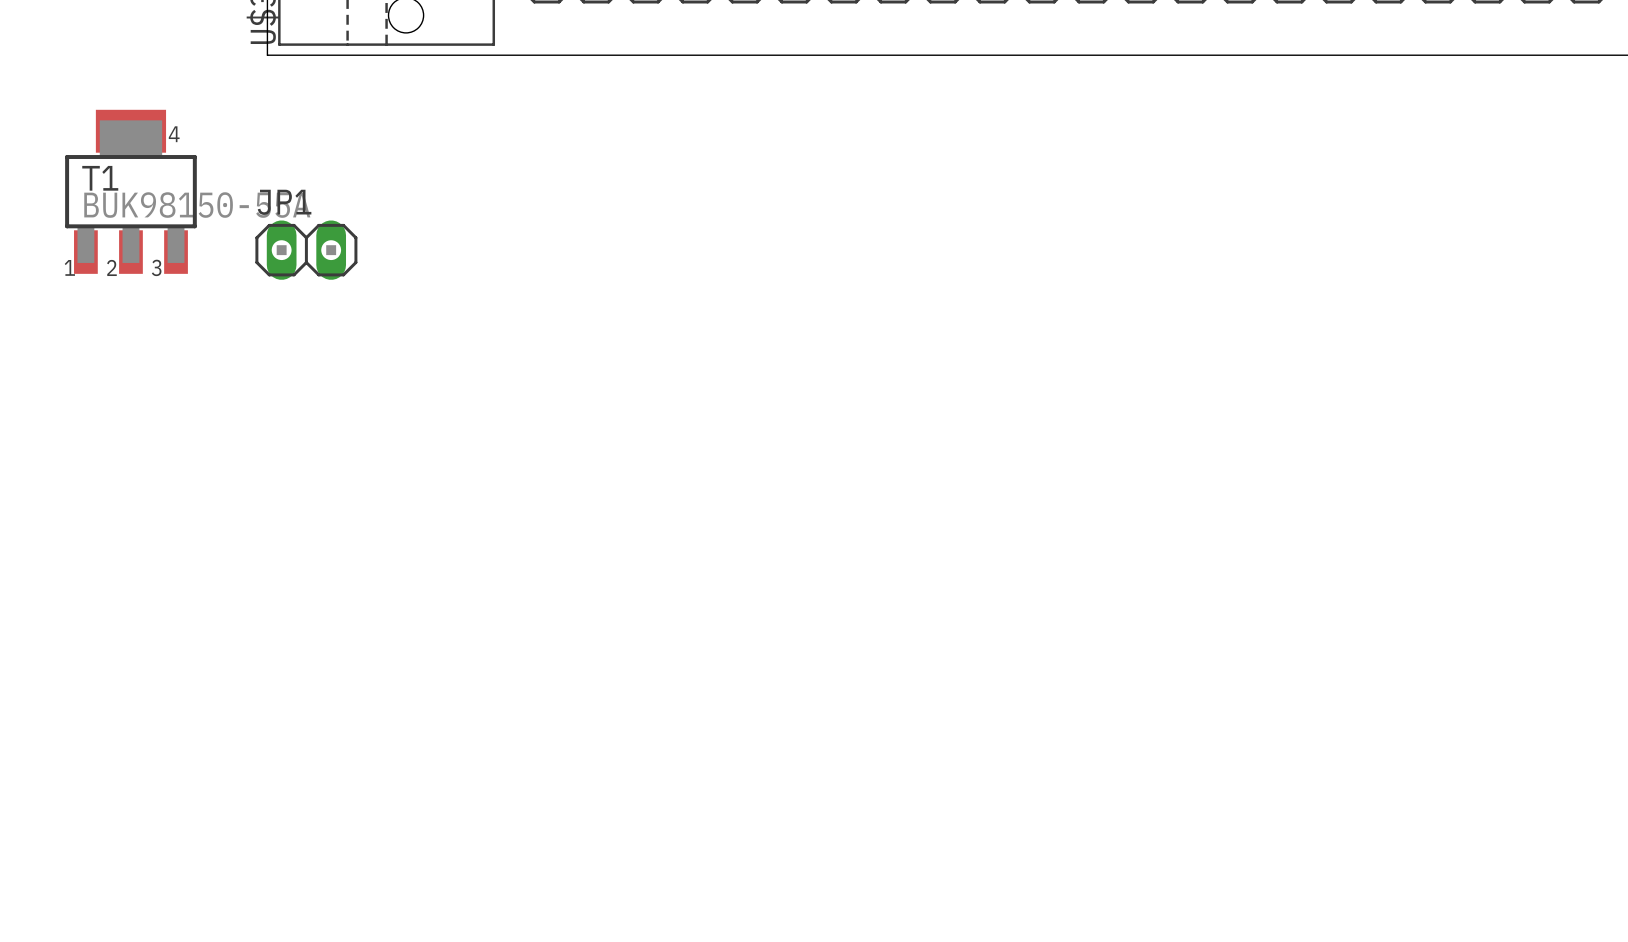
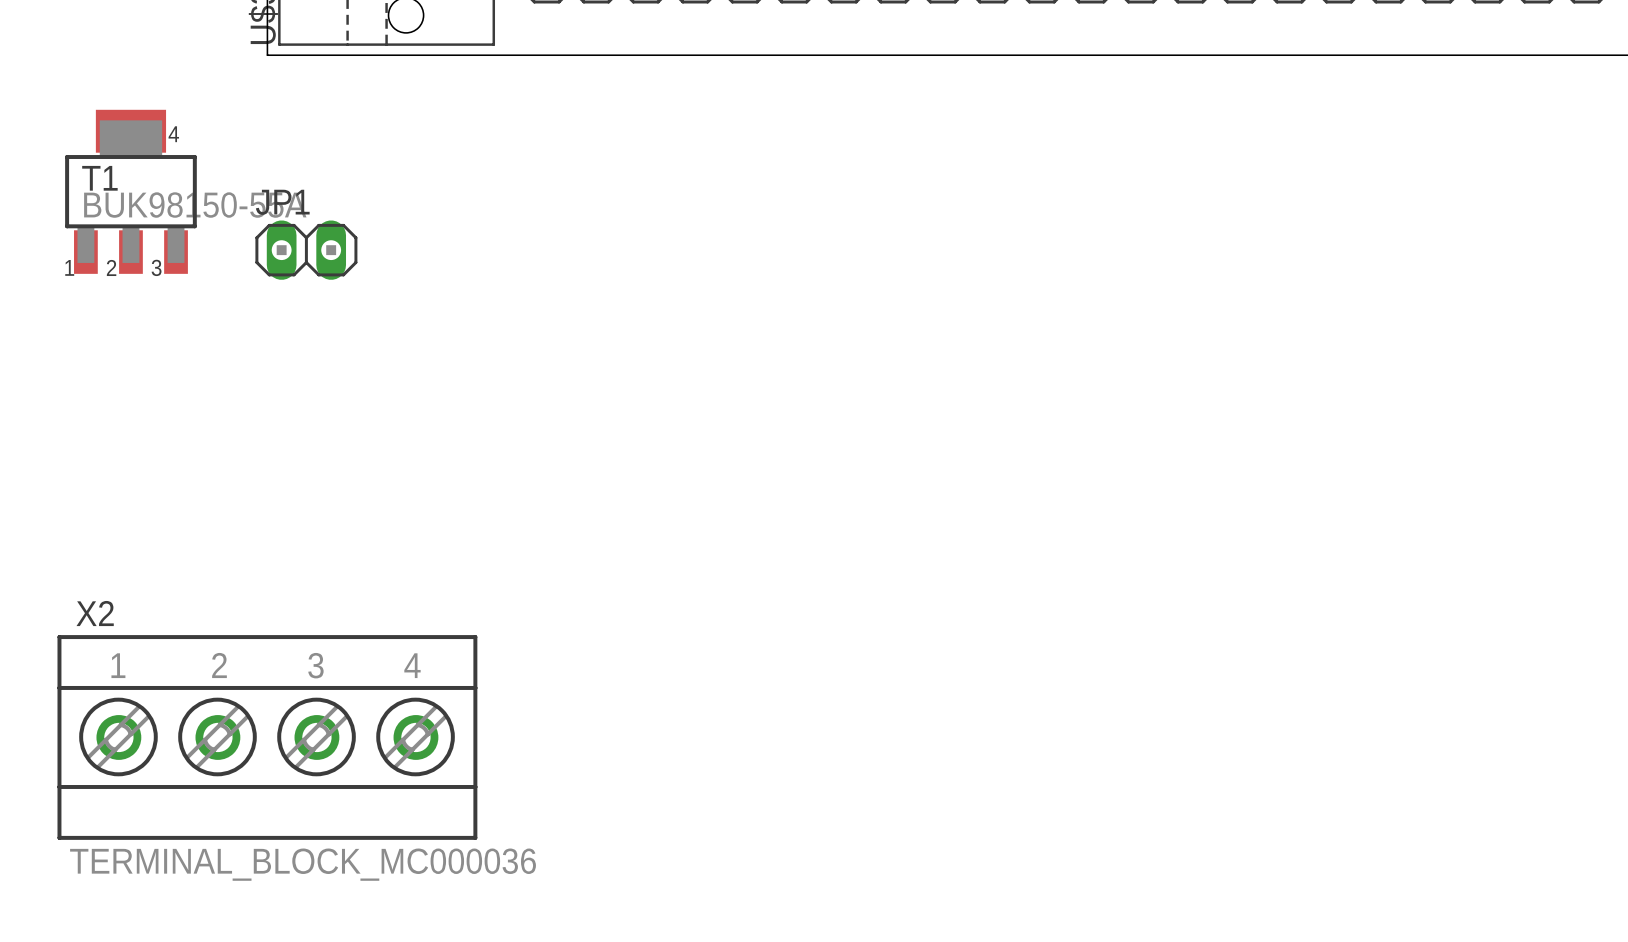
X2: none -> TERMINAL_BLOCK_MC000036 (267, 737)

